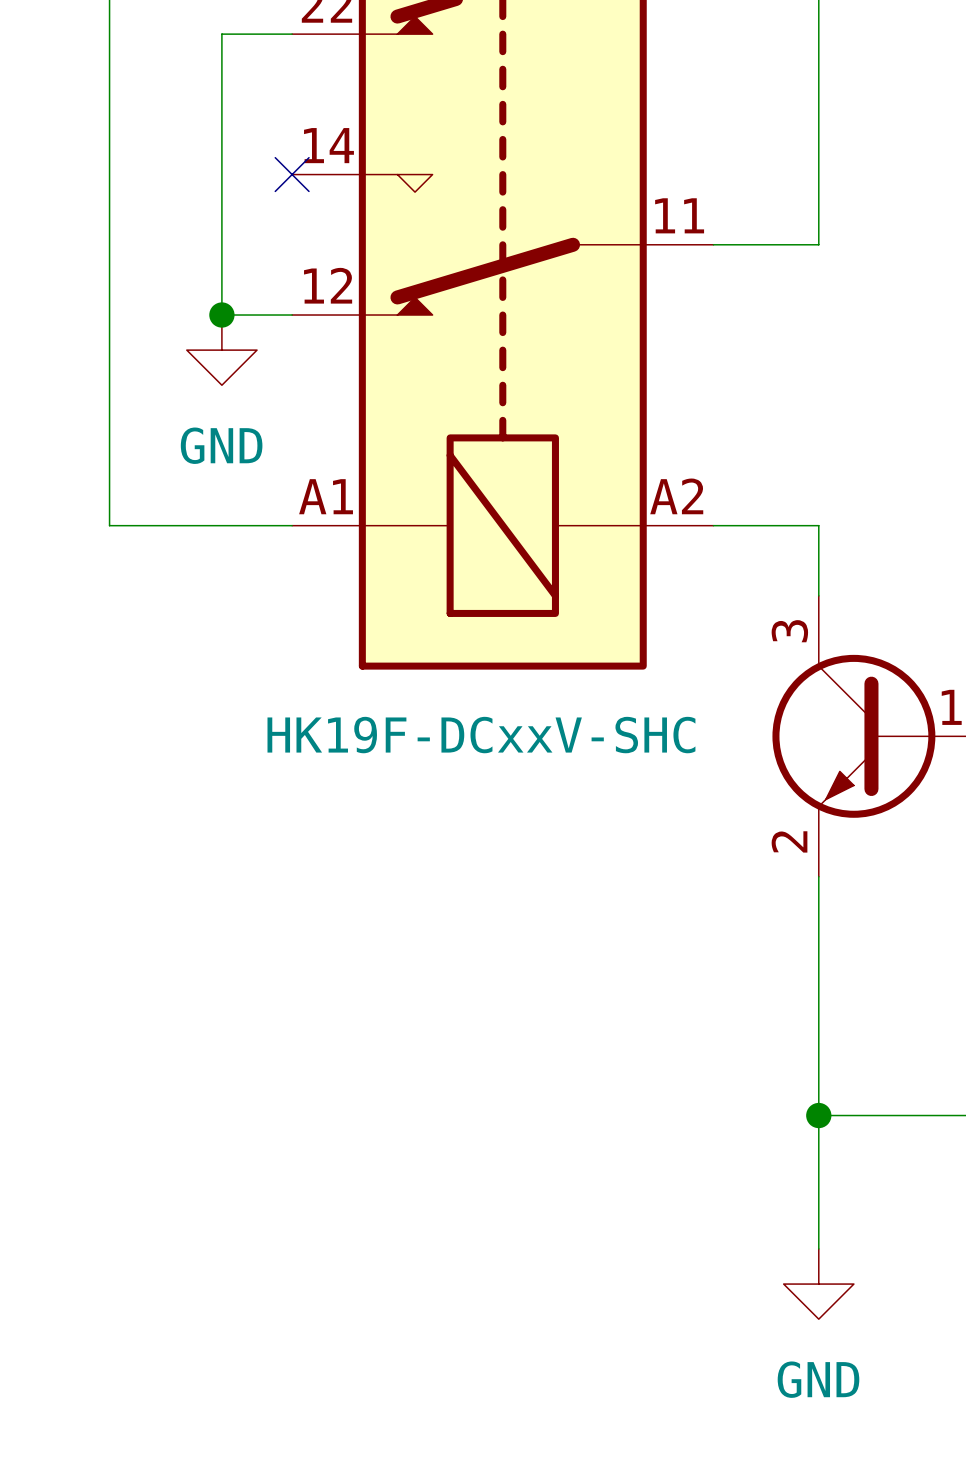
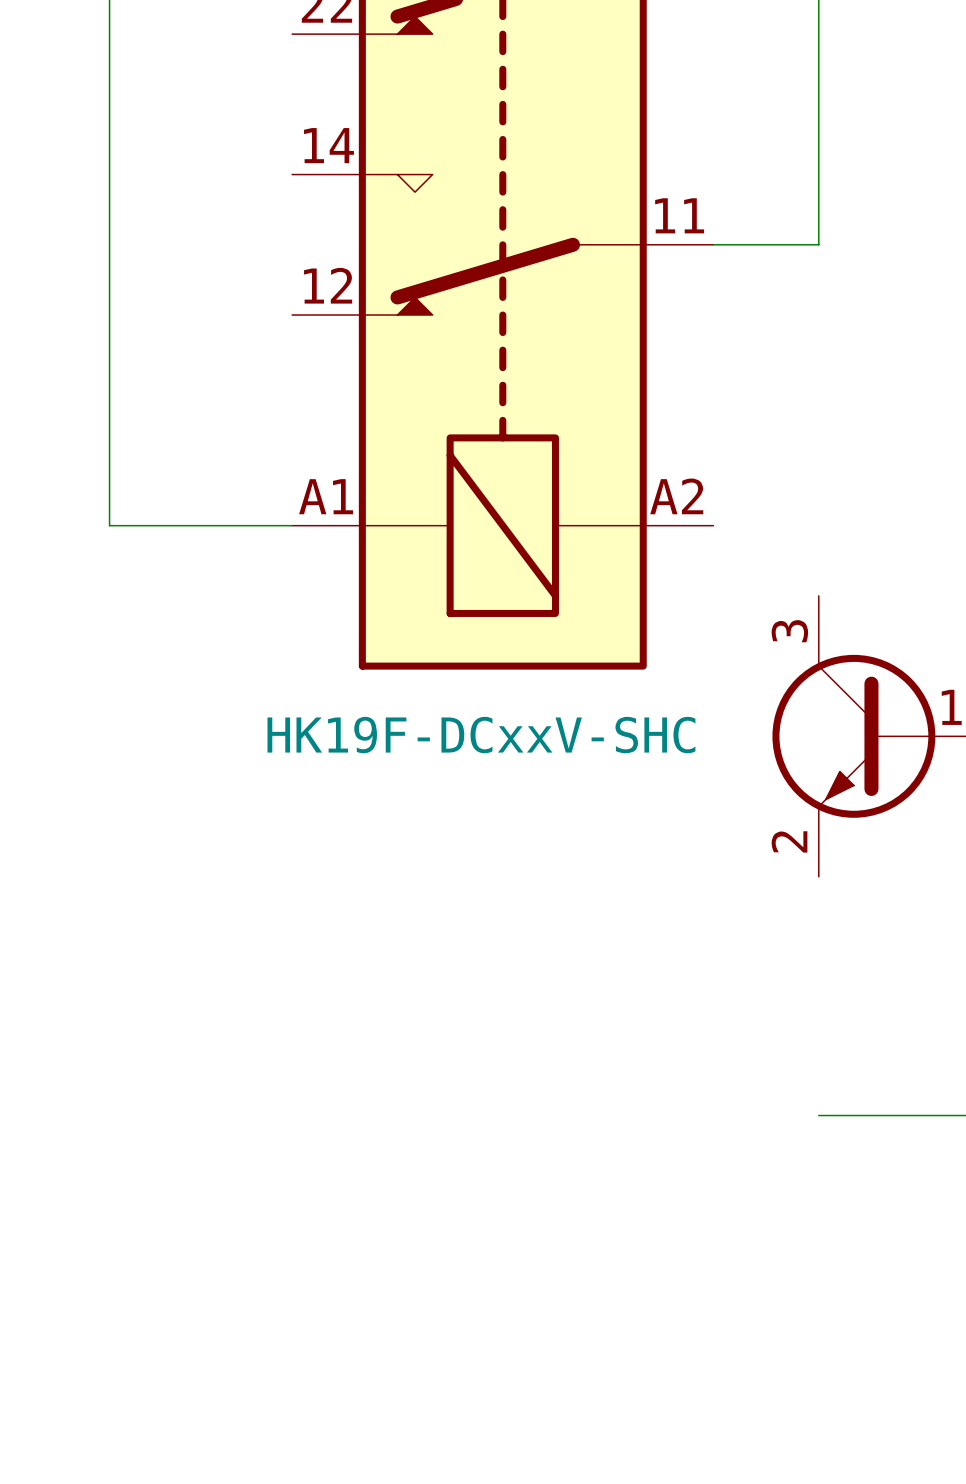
wire: (292, 34) (221, 34) (221, 315) (292, 315) -> none
no-connect mark: (292, 174) -> none
junction: (221, 315) -> none
power symbol: GND (221, 350) -> none
wire: (713, 525) (818, 525) (818, 595) -> none
wire: (818, 876) (818, 1248) -> none
junction: (818, 1115) -> none
power symbol: GND (818, 1284) -> none

